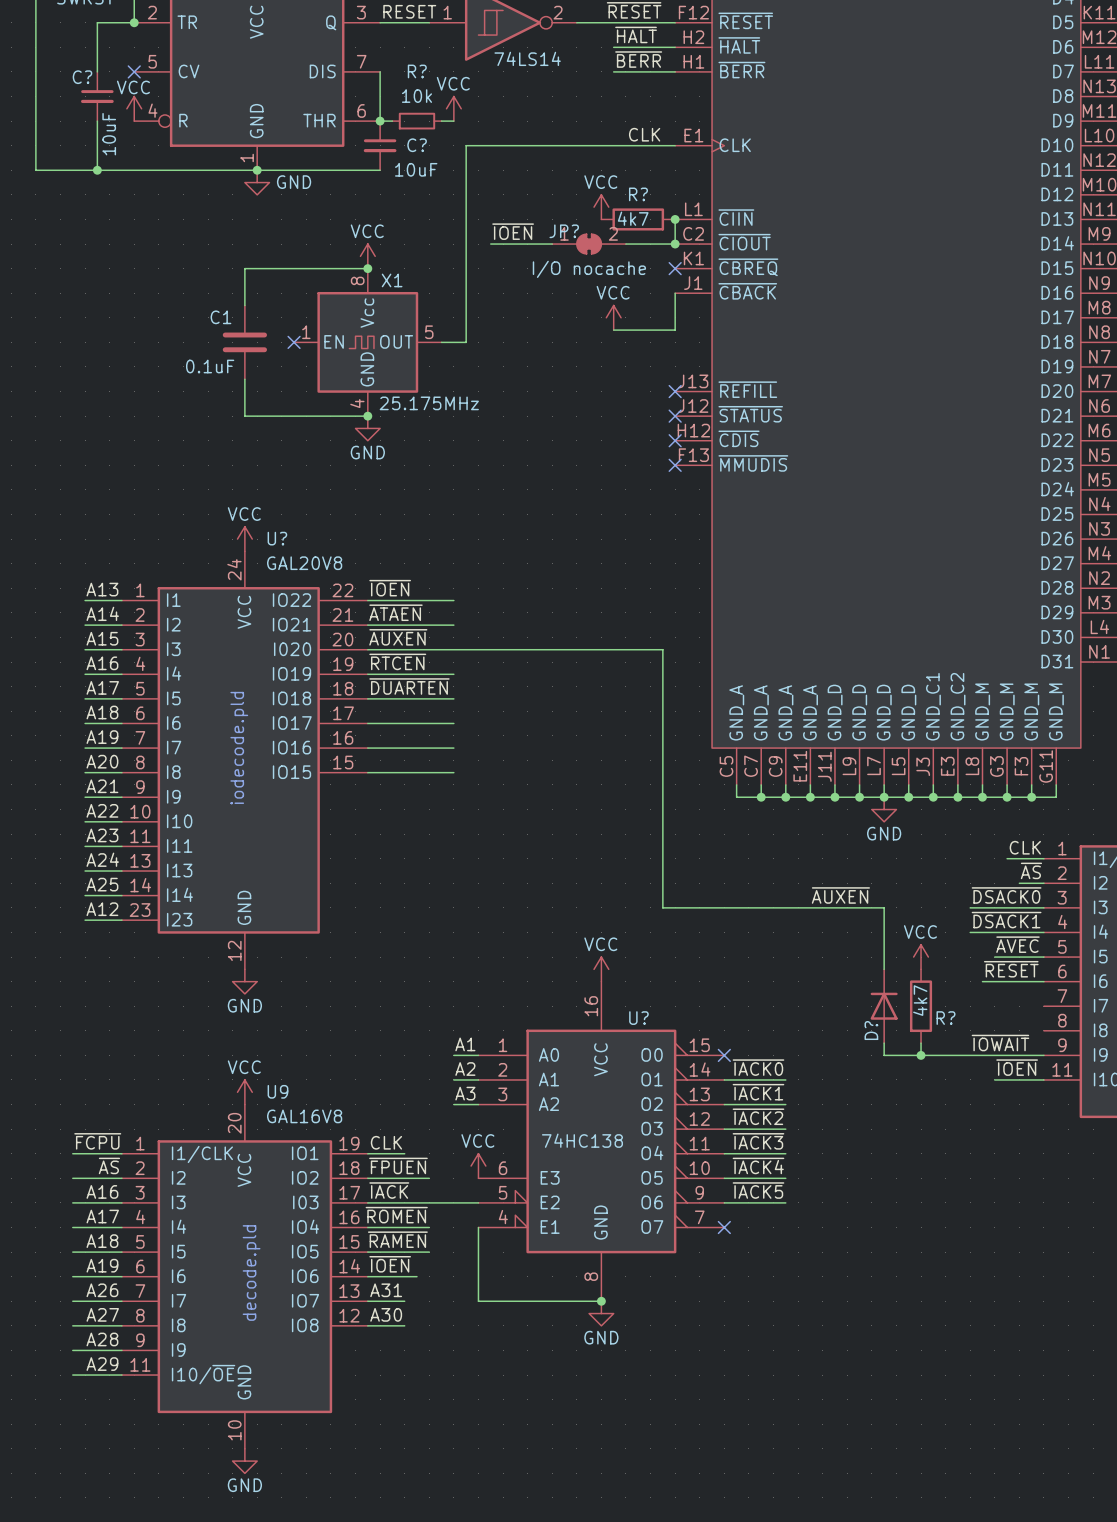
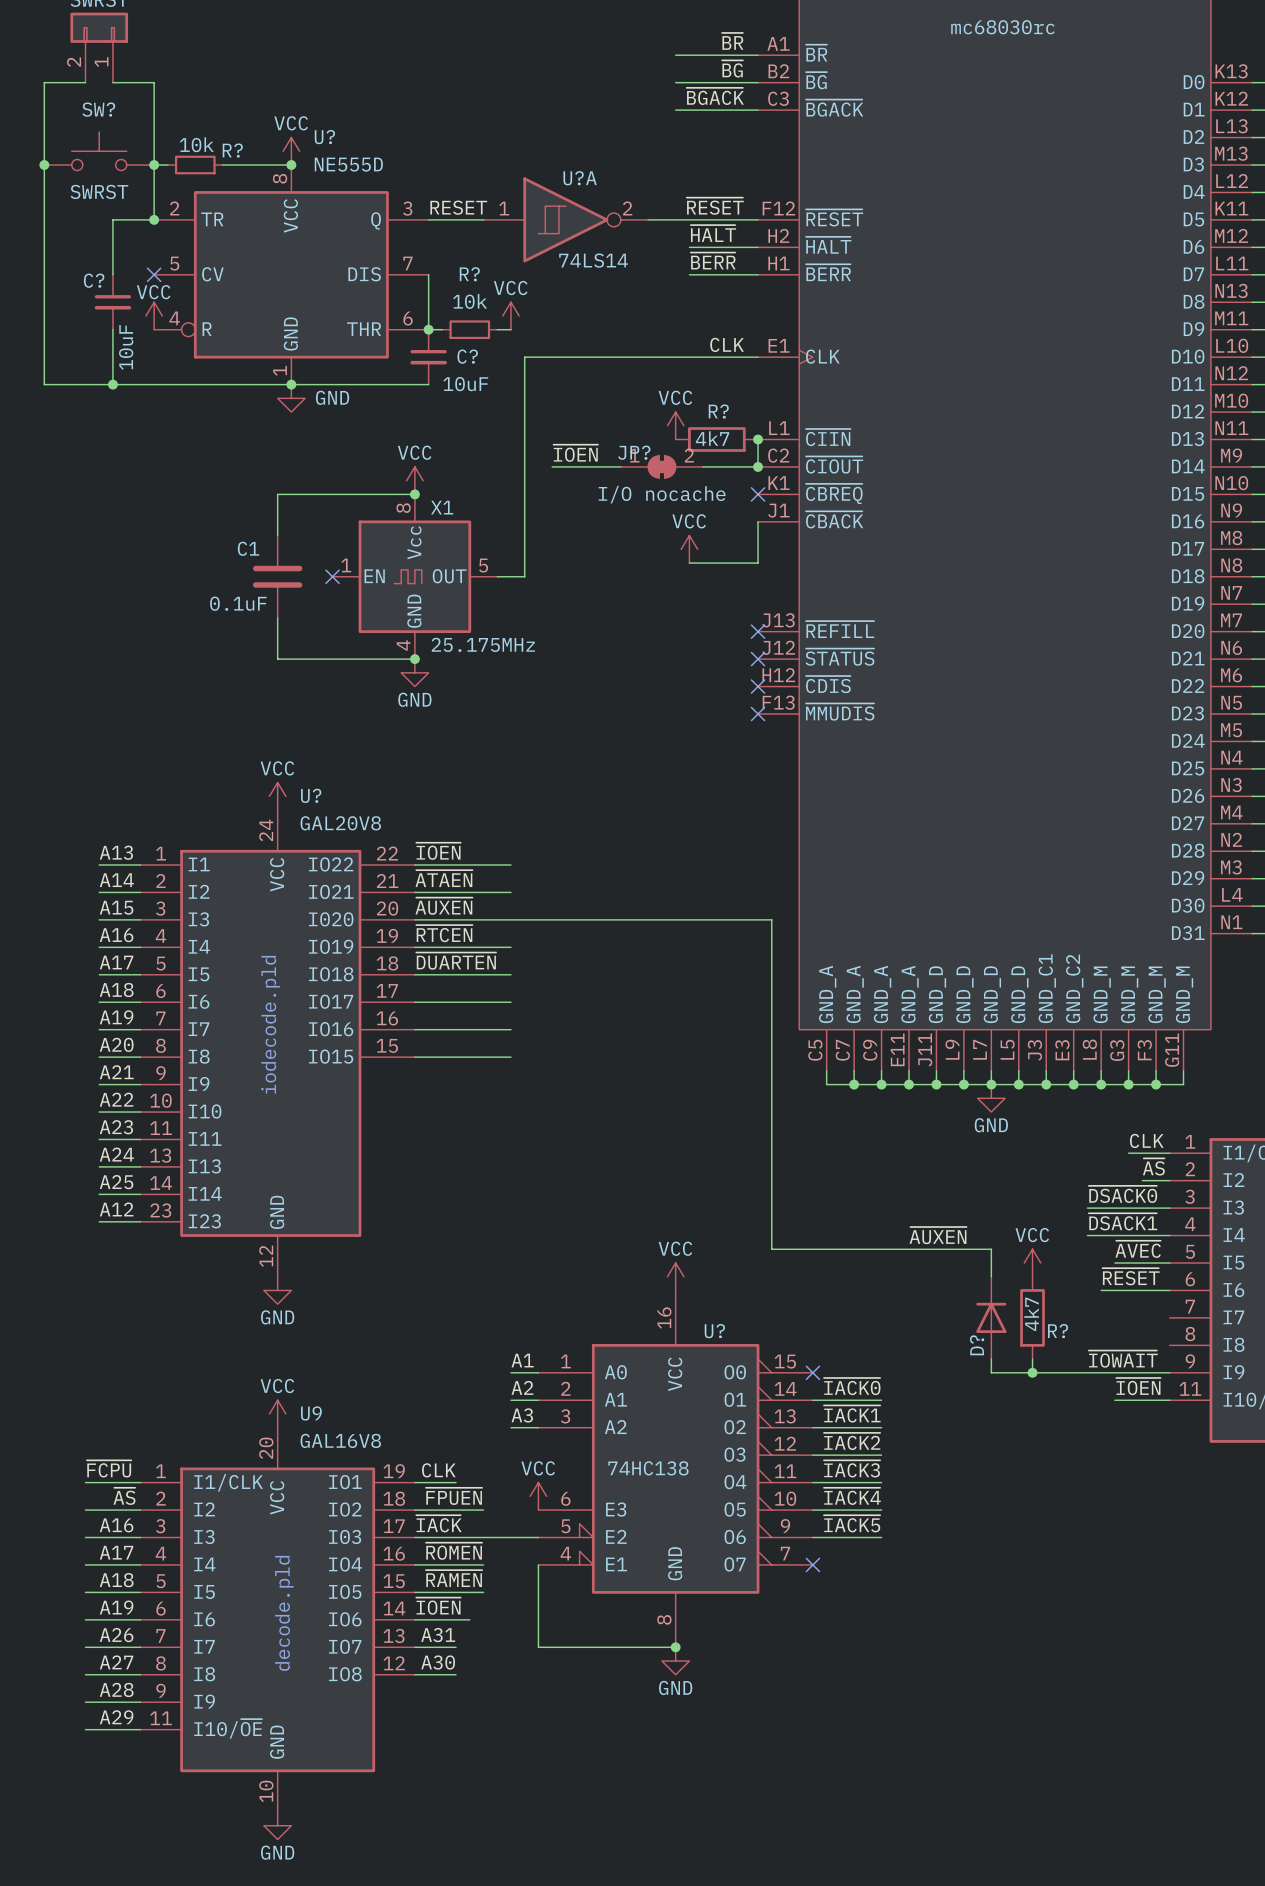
wire: (662, 649) (662, 907) (884, 907) (884, 944) -> (744, 919) (771, 919) (771, 1249) (991, 1249)
label position: ~{AUXEN} (840, 895) -> ~{AUXEN} (938, 1235)

